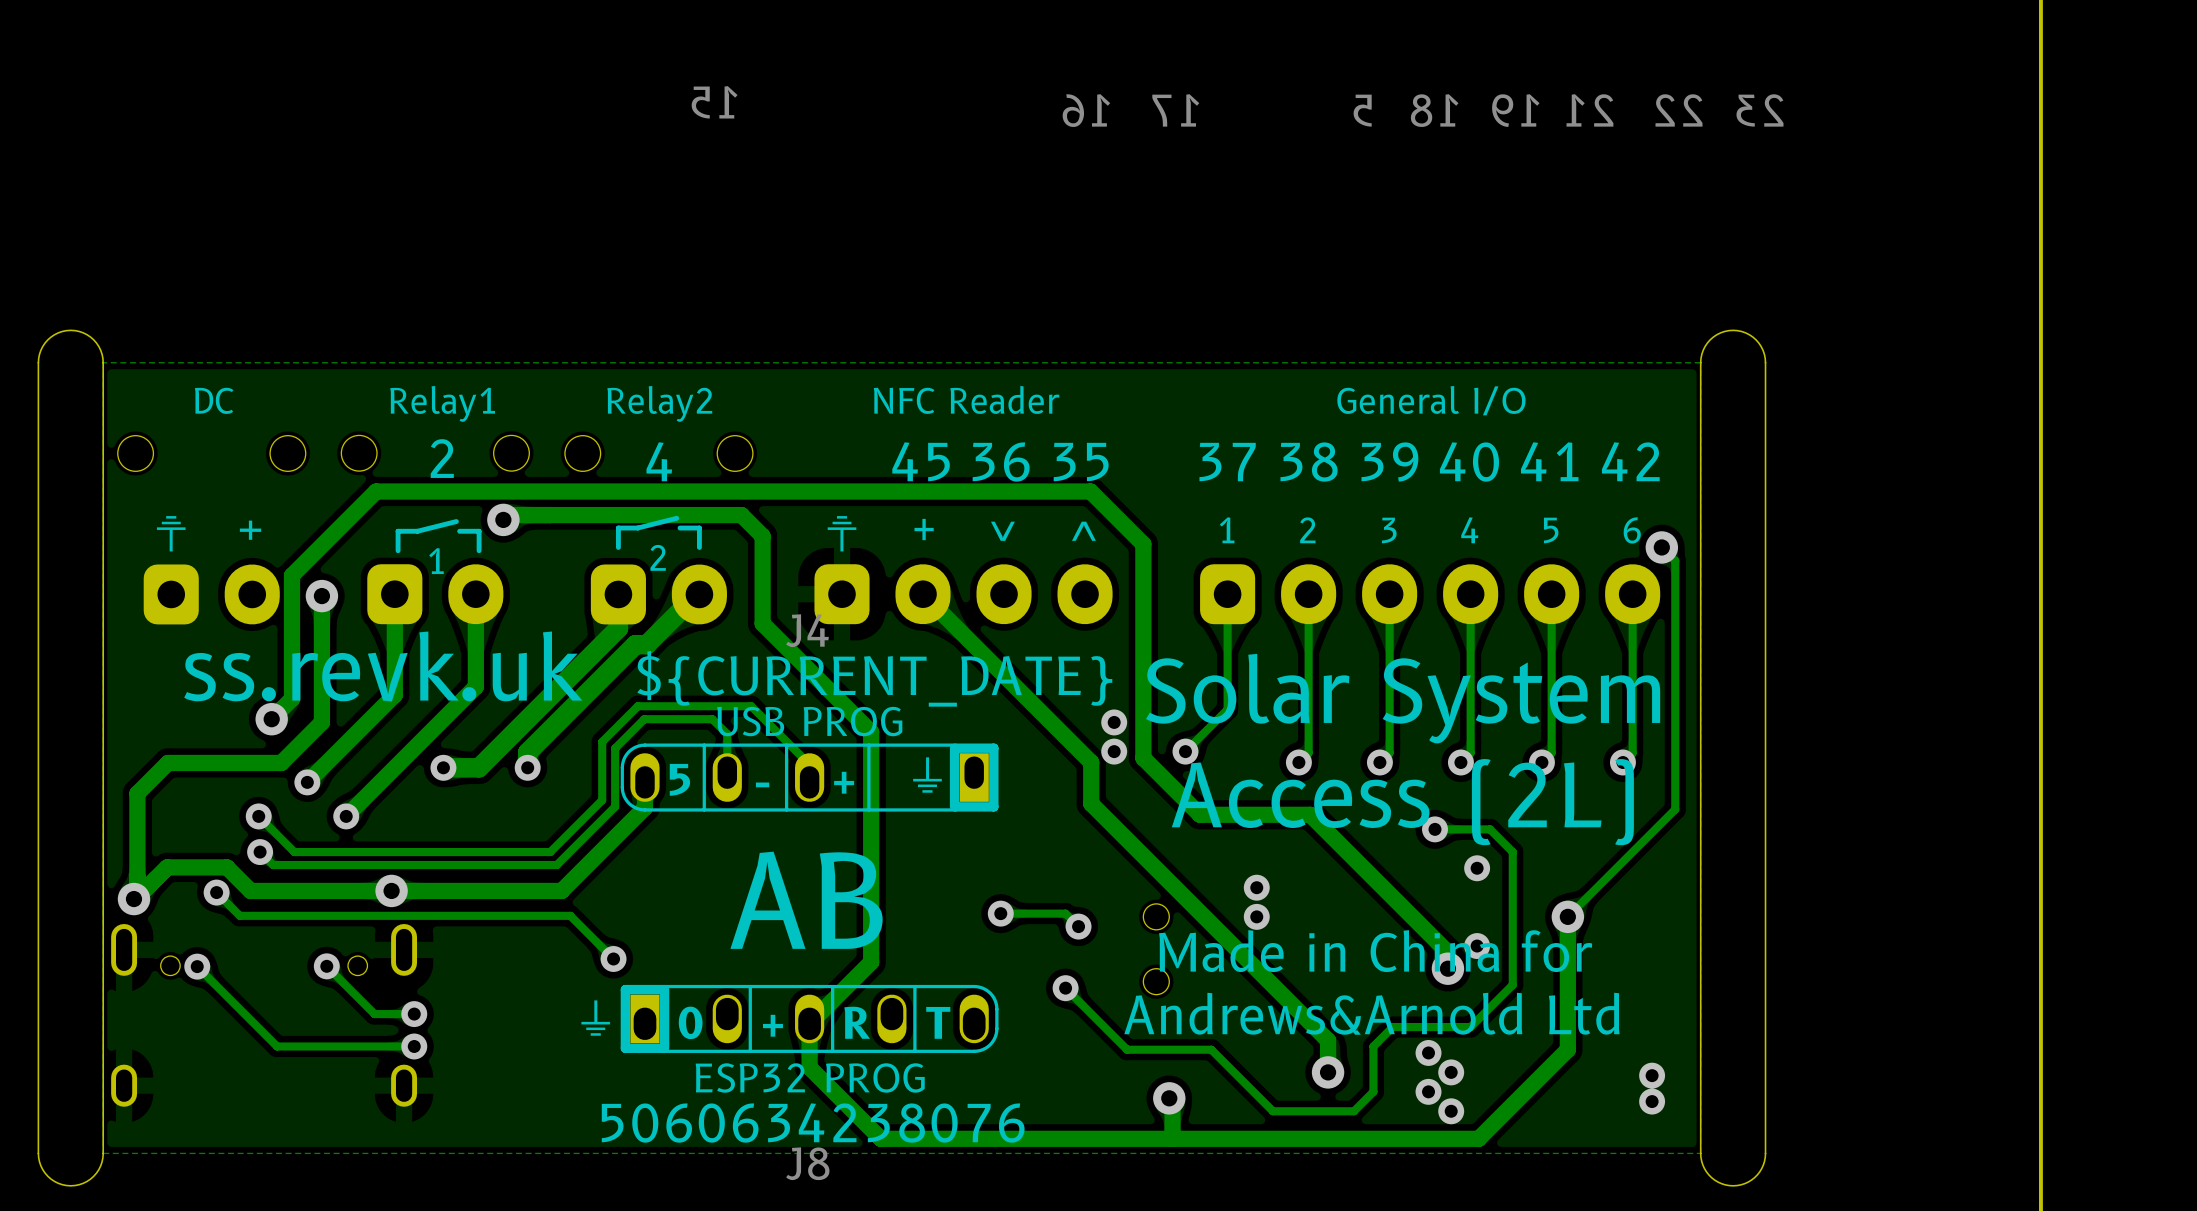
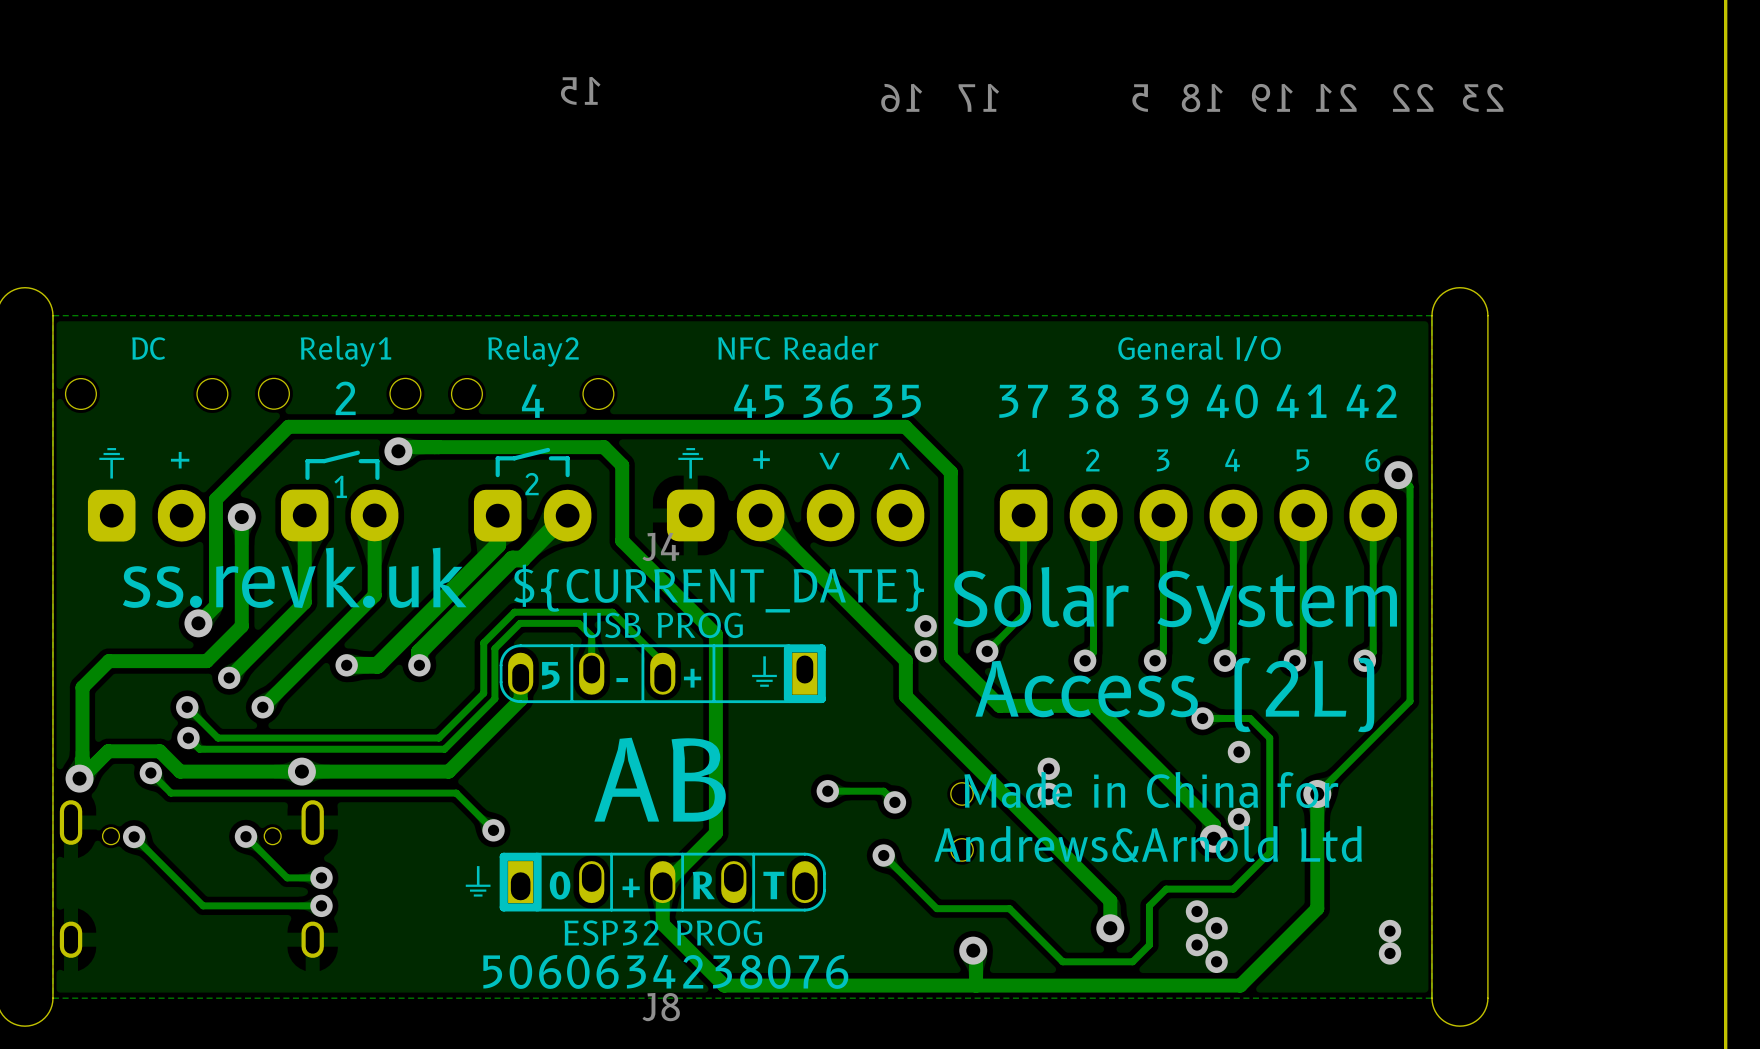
text position: Made in China for (1375, 951) -> Made in China for (1151, 789)
text position: Andrews&Arnold Ltd (1371, 1013) -> Andrews&Arnold Ltd (1148, 844)

